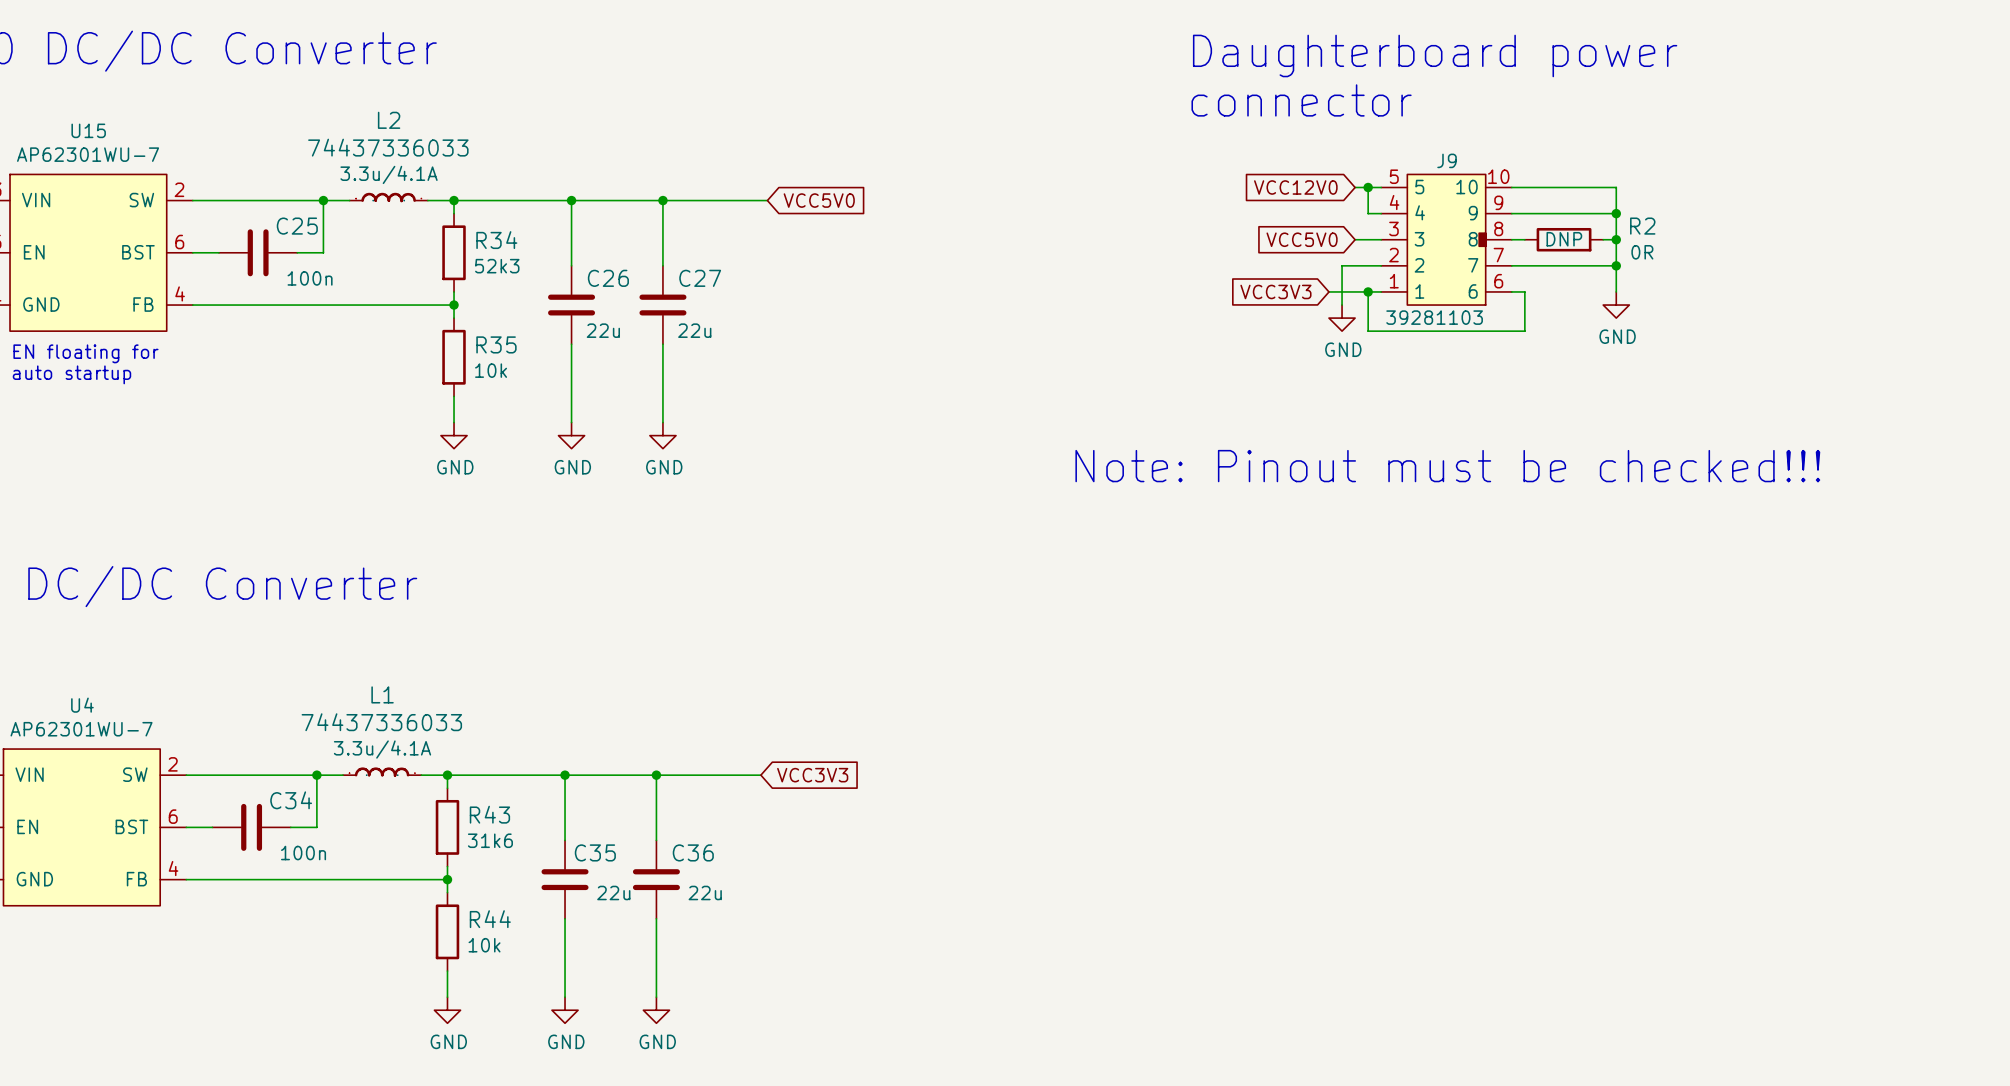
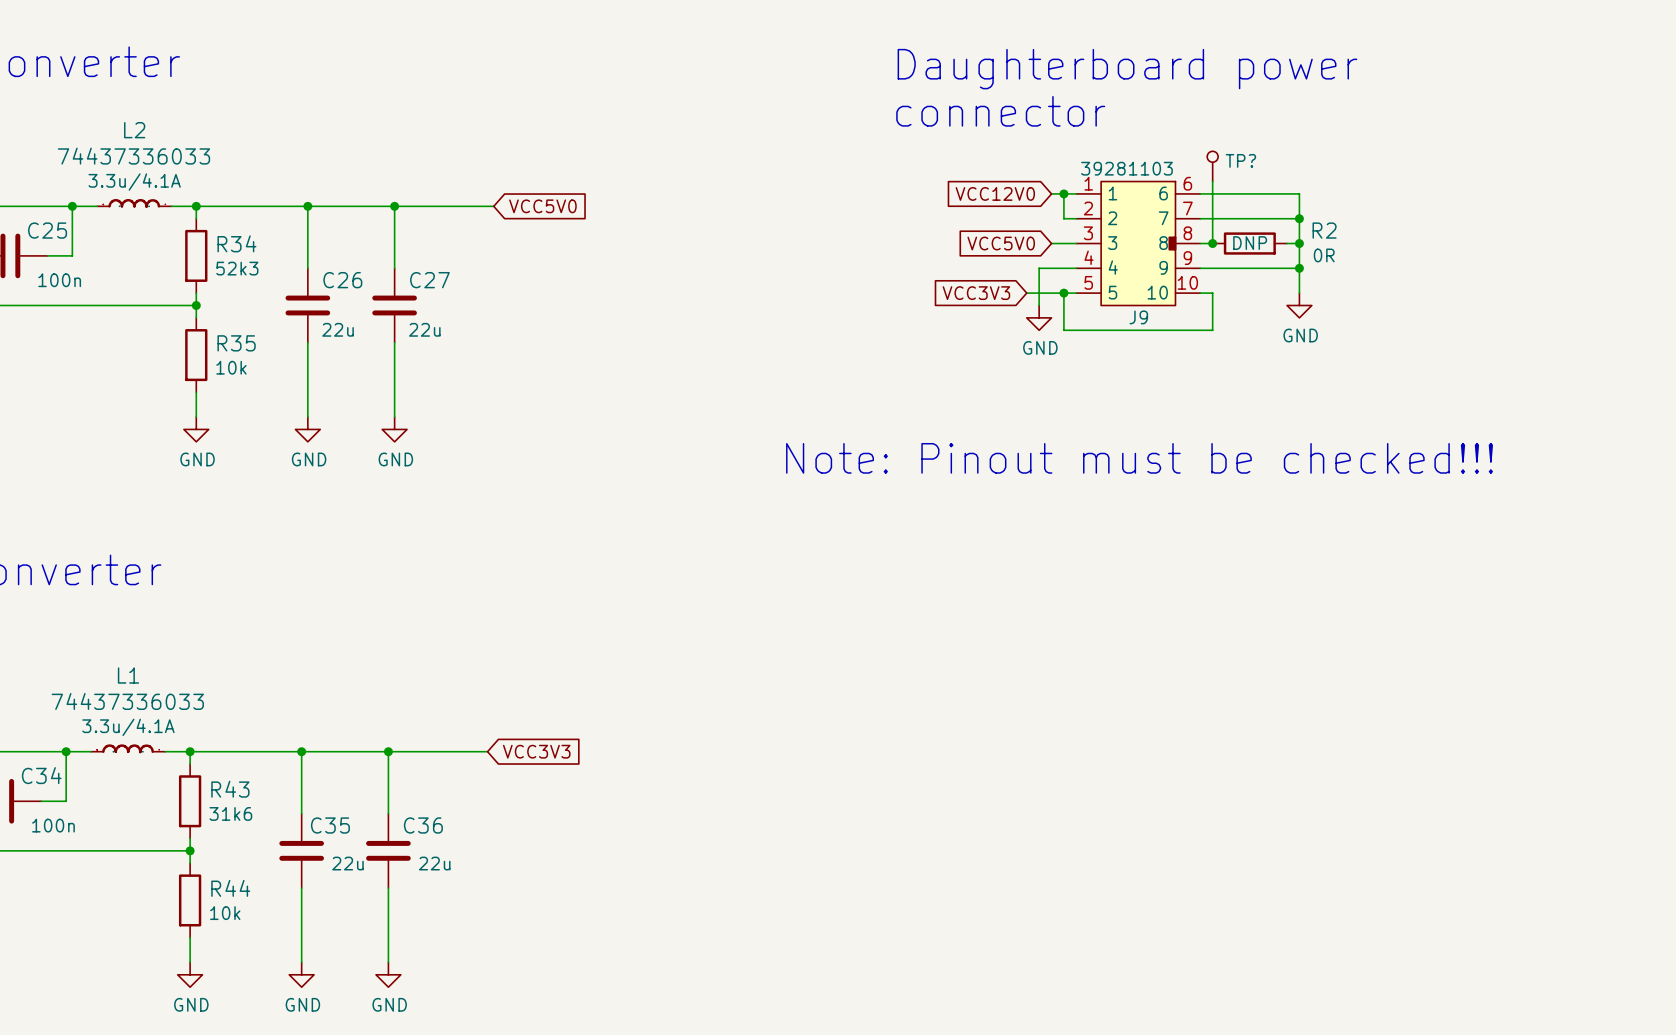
TP?: none -> (1212, 166)
wire: none -> (1212, 181) (1212, 243)
J9 flip: as is (1446, 239) -> up-down (1138, 243)
junction: none -> (1212, 243)

